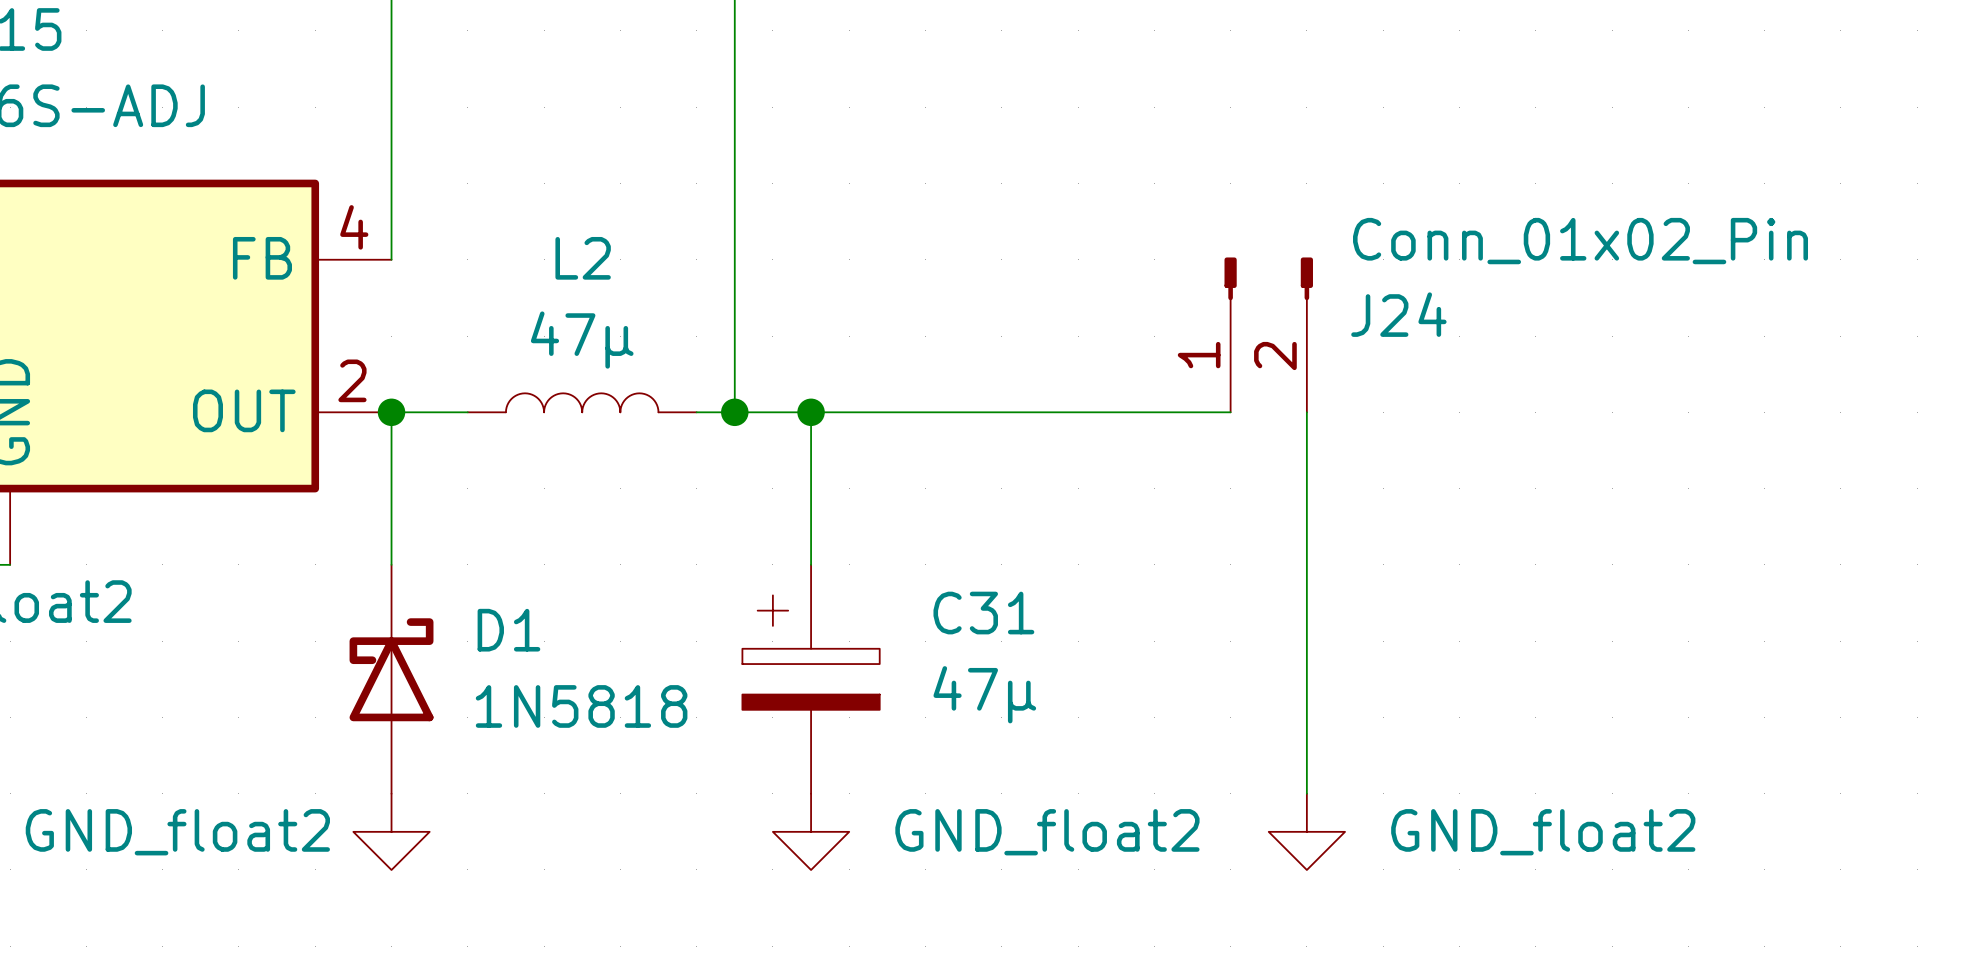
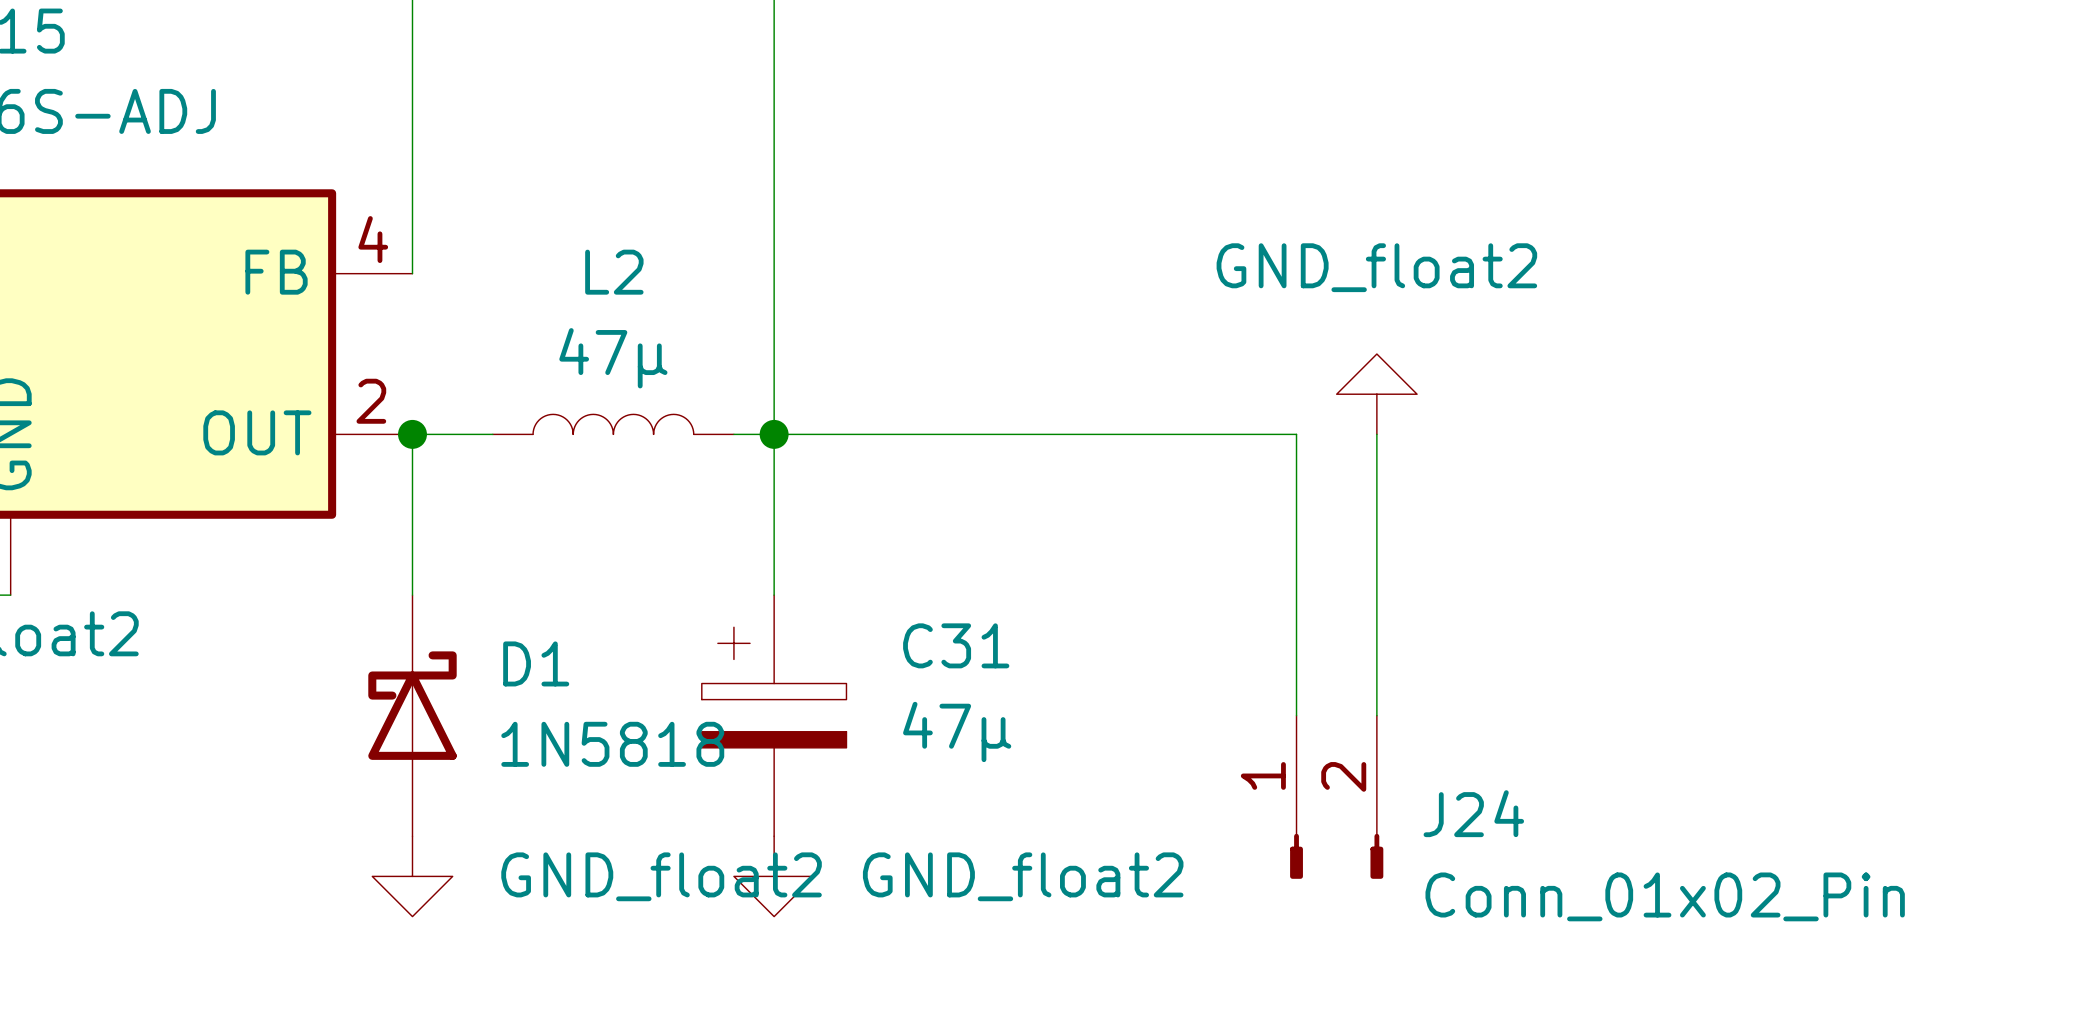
J24 flip: as is (1268, 278) -> up-down (1336, 856)
J24 position: (1268, 334) -> (1336, 797)
power symbol: none -> GND_float2 (1376, 394)
wire: (811, 412) (811, 564) -> (774, 434) (774, 595)
junction: (811, 412) -> none
wire: none -> (1296, 434) (1296, 715)
C31 position: (811, 679) -> (774, 715)
power symbol position: GND_float2 (811, 831) -> GND_float2 (774, 876)
power symbol: GND_float2 (1306, 831) -> none
power symbol text position: GND_float2 (177, 832) -> GND_float2 (661, 876)

